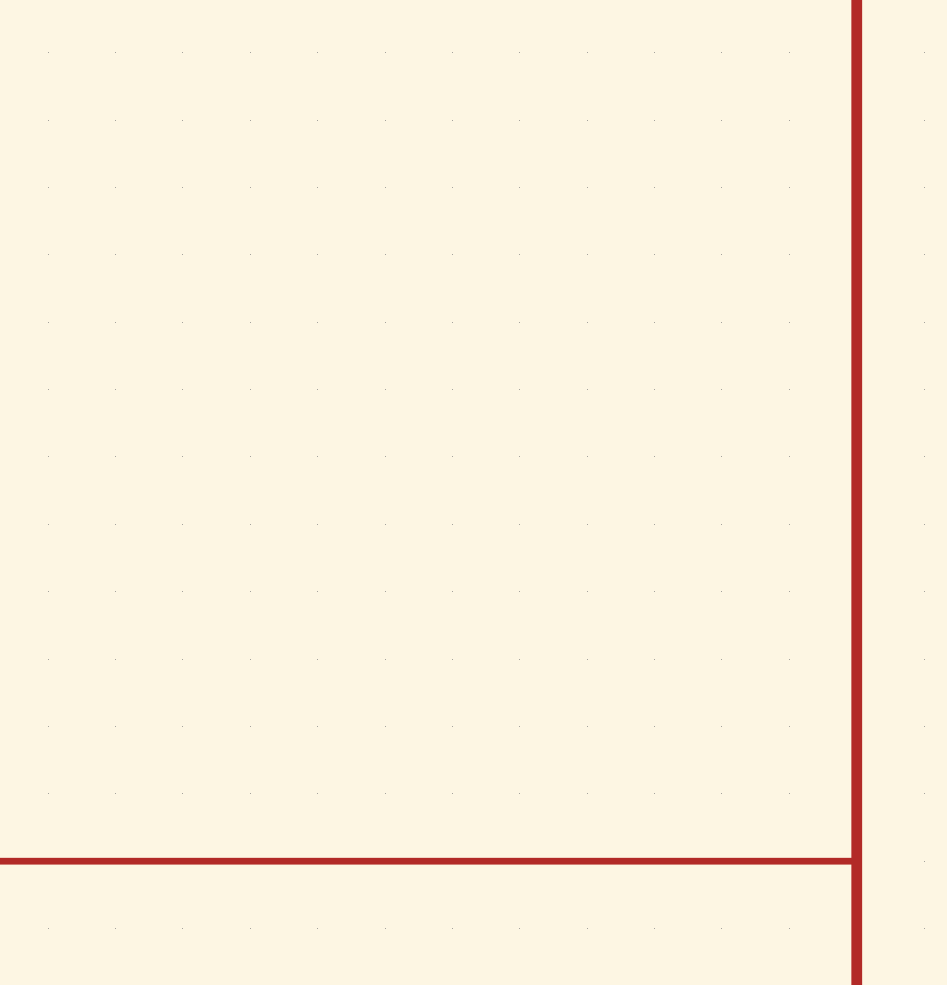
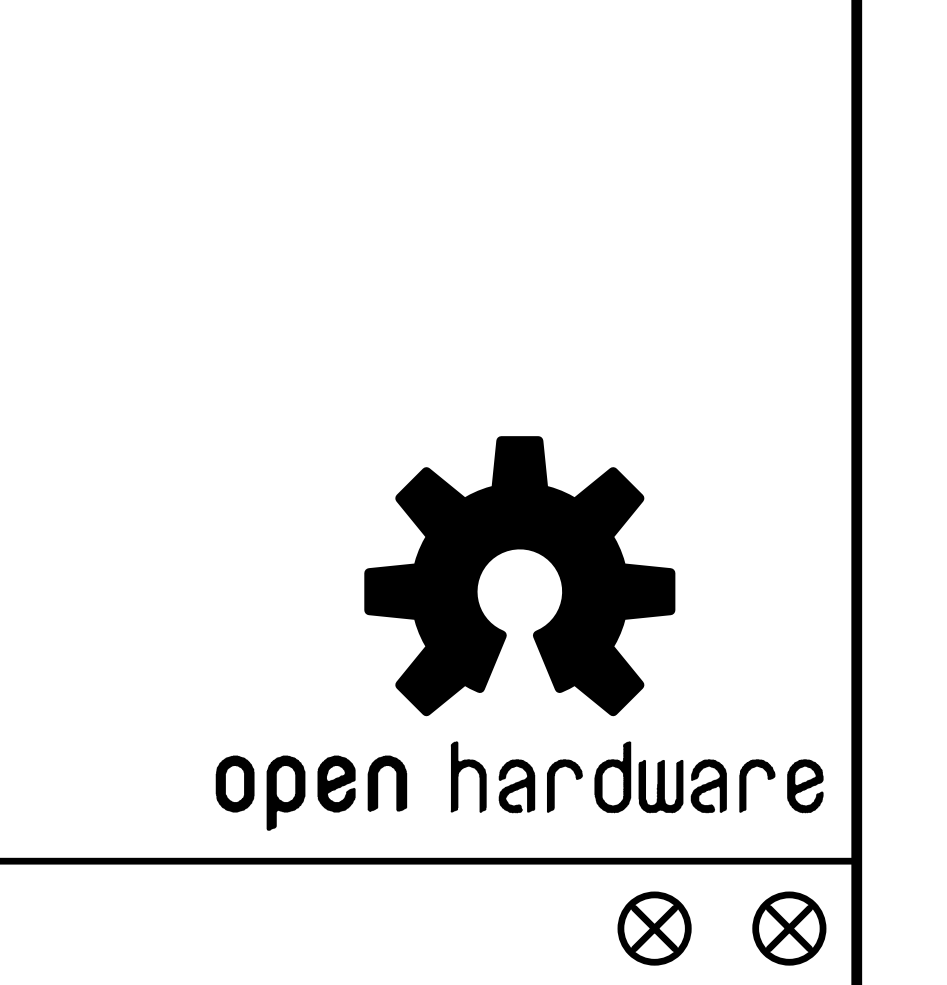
part: none -> (519, 633)
part: none -> (654, 928)
part: none -> (789, 928)

